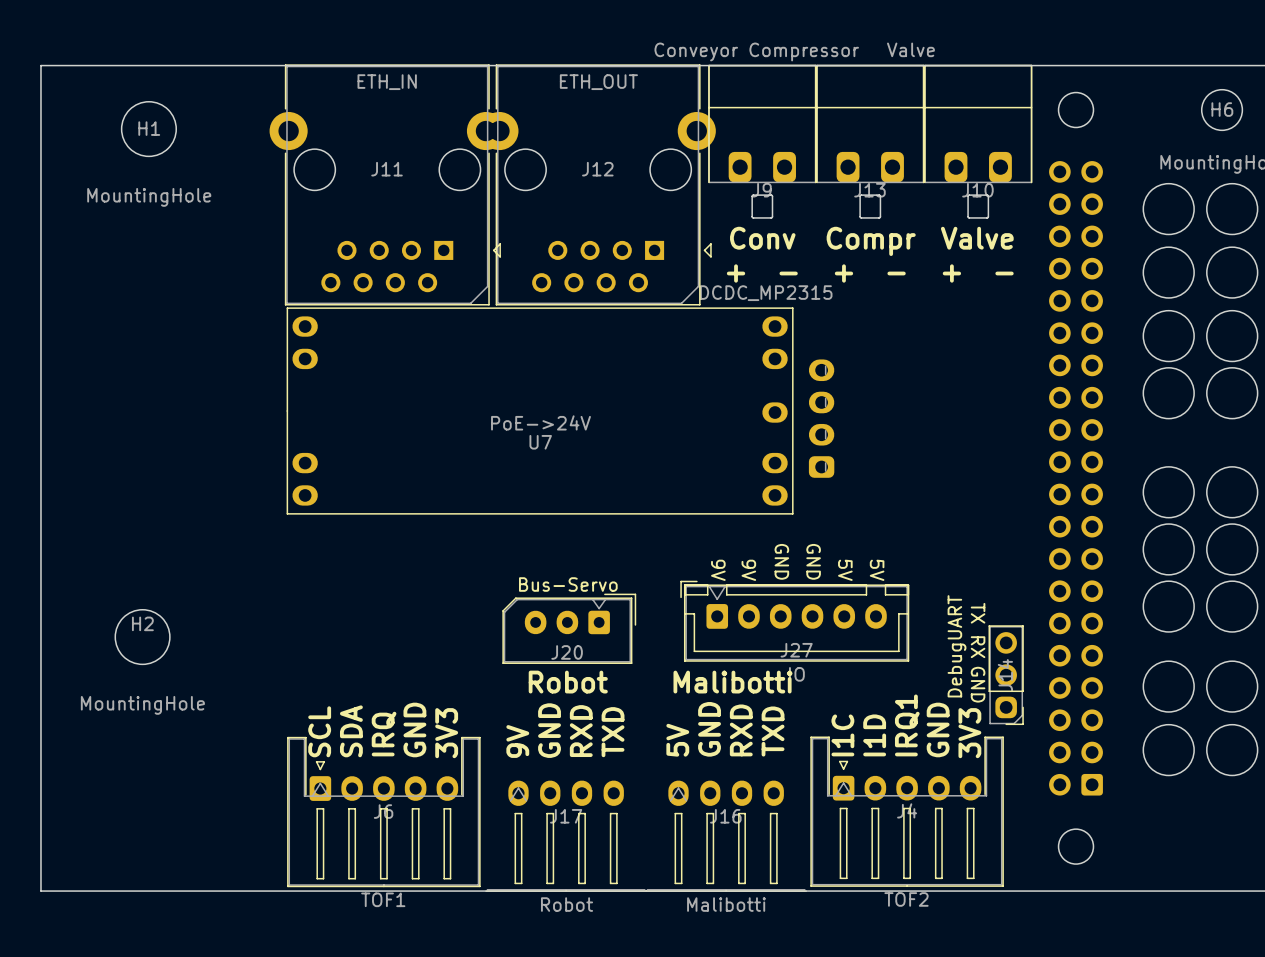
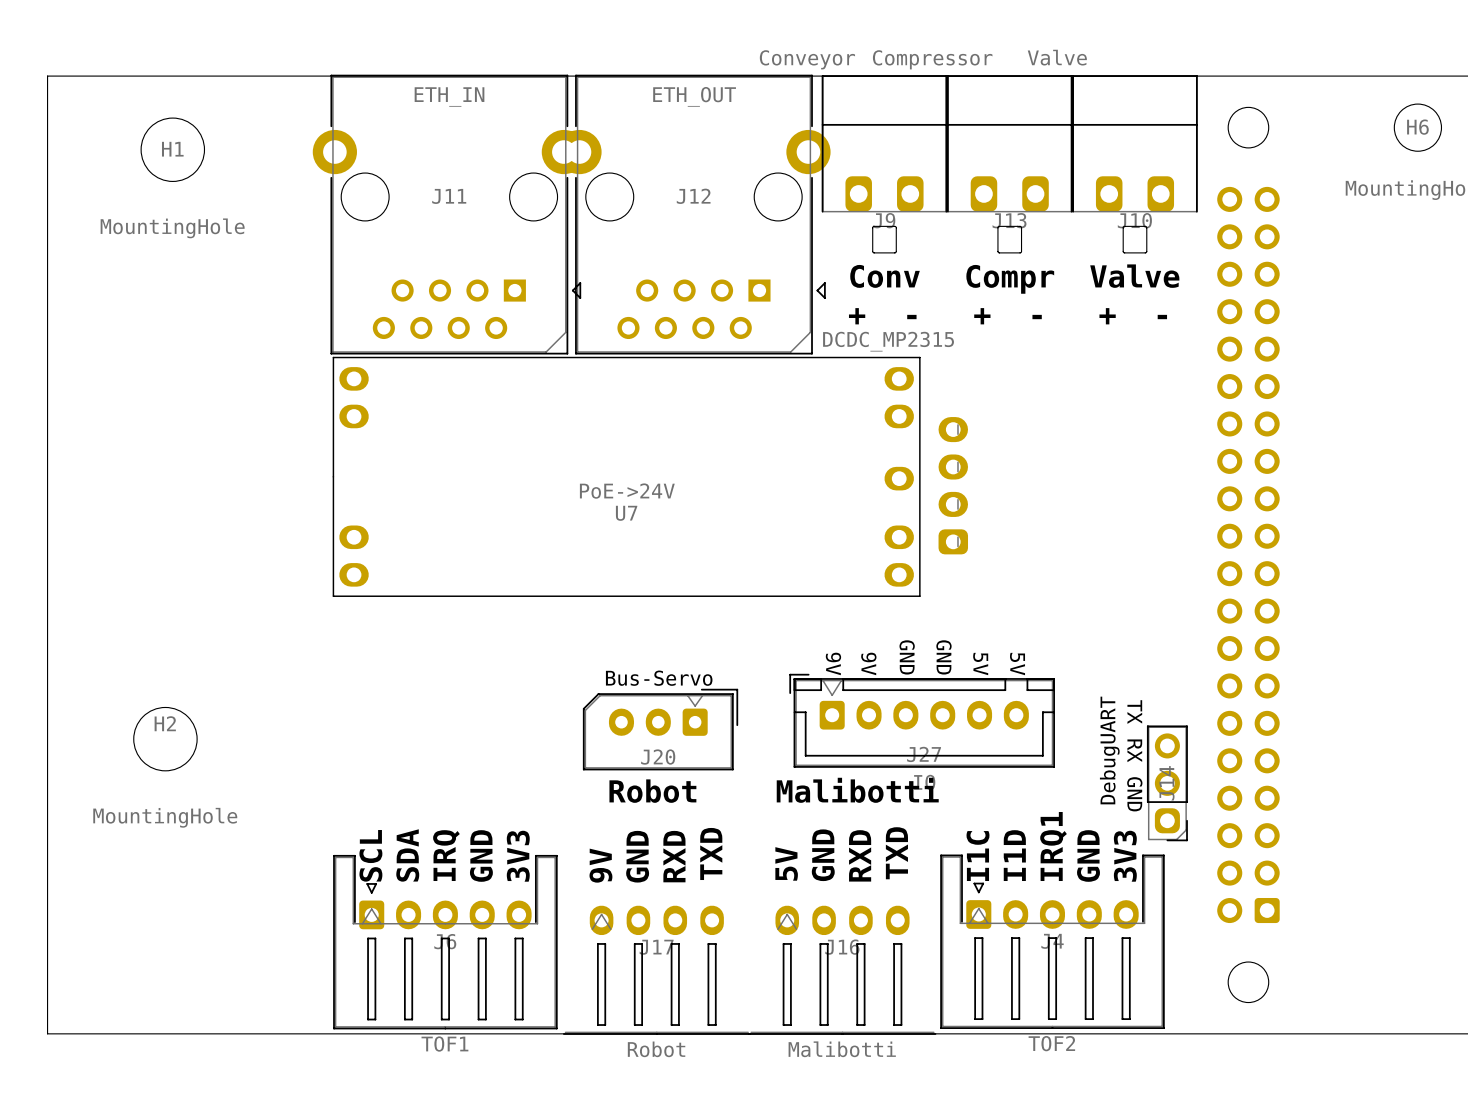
round board edge: [1143, 183, 1195, 235] -> none
round board edge: [1206, 183, 1258, 235] -> none
round board edge: [1143, 246, 1195, 299] -> none
round board edge: [1206, 246, 1258, 299] -> none
round board edge: [1143, 310, 1195, 362] -> none
round board edge: [1206, 310, 1258, 362] -> none
round board edge: [1143, 367, 1195, 419] -> none
round board edge: [1206, 367, 1258, 419] -> none
round board edge: [1143, 466, 1195, 519] -> none
round board edge: [1206, 466, 1258, 519] -> none
round board edge: [1143, 523, 1195, 576] -> none
round board edge: [1206, 523, 1258, 576] -> none
round board edge: [1143, 580, 1195, 633] -> none
round board edge: [1206, 580, 1258, 633] -> none
round board edge: [1143, 660, 1195, 713] -> none
round board edge: [1206, 660, 1258, 713] -> none
round board edge: [1143, 724, 1195, 776] -> none
round board edge: [1206, 724, 1258, 776] -> none

